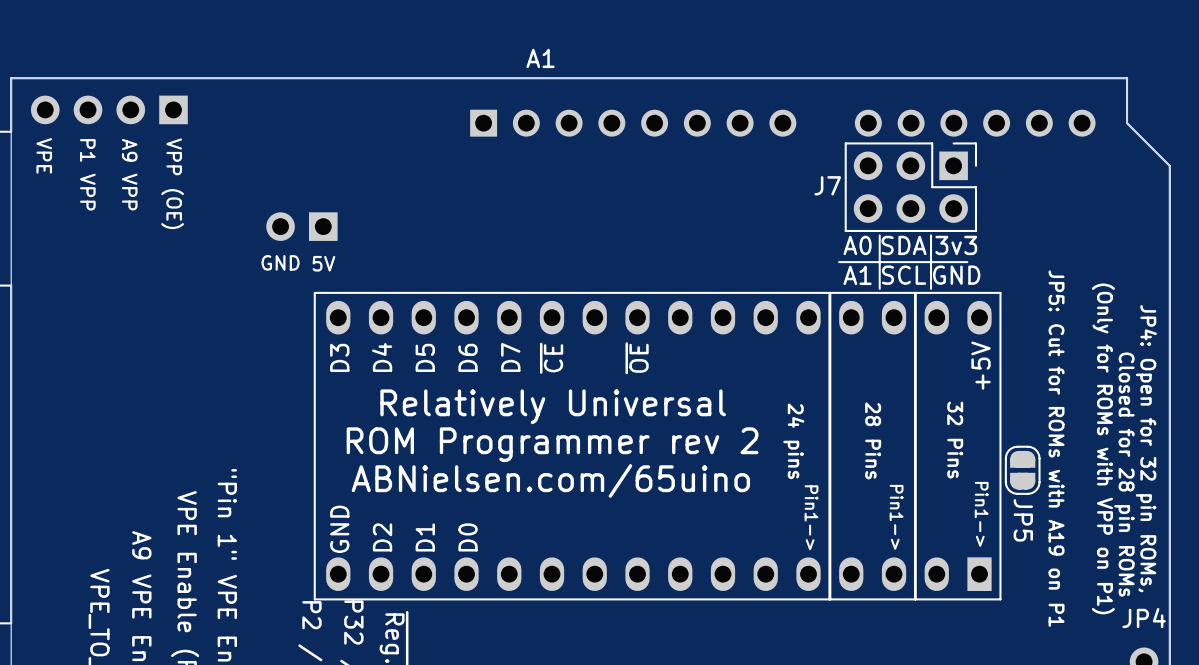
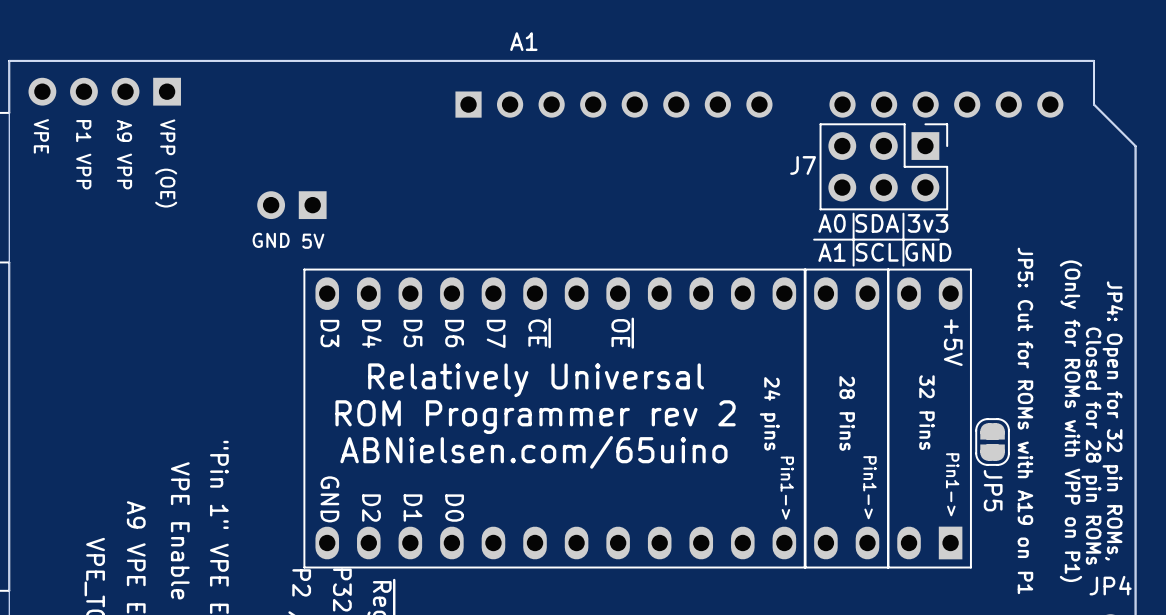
text rotation: 0° (339, 357) -> 180° (329, 333)
text rotation: 0° (382, 357) -> 180° (371, 333)
text rotation: 0° (425, 357) -> 180° (413, 333)
text rotation: 0° (468, 357) -> 180° (454, 333)
text rotation: 0° (510, 357) -> 180° (496, 333)
text rotation: 0° (551, 358) -> 180° (539, 333)
text rotation: 0° (637, 358) -> 180° (622, 333)
text rotation: 0° (981, 365) -> 180° (953, 342)
text rotation: 0° (339, 529) -> 180° (329, 499)
text rotation: 0° (382, 537) -> 180° (371, 508)
text rotation: 0° (425, 537) -> 180° (413, 508)
text rotation: 0° (468, 537) -> 180° (454, 508)

